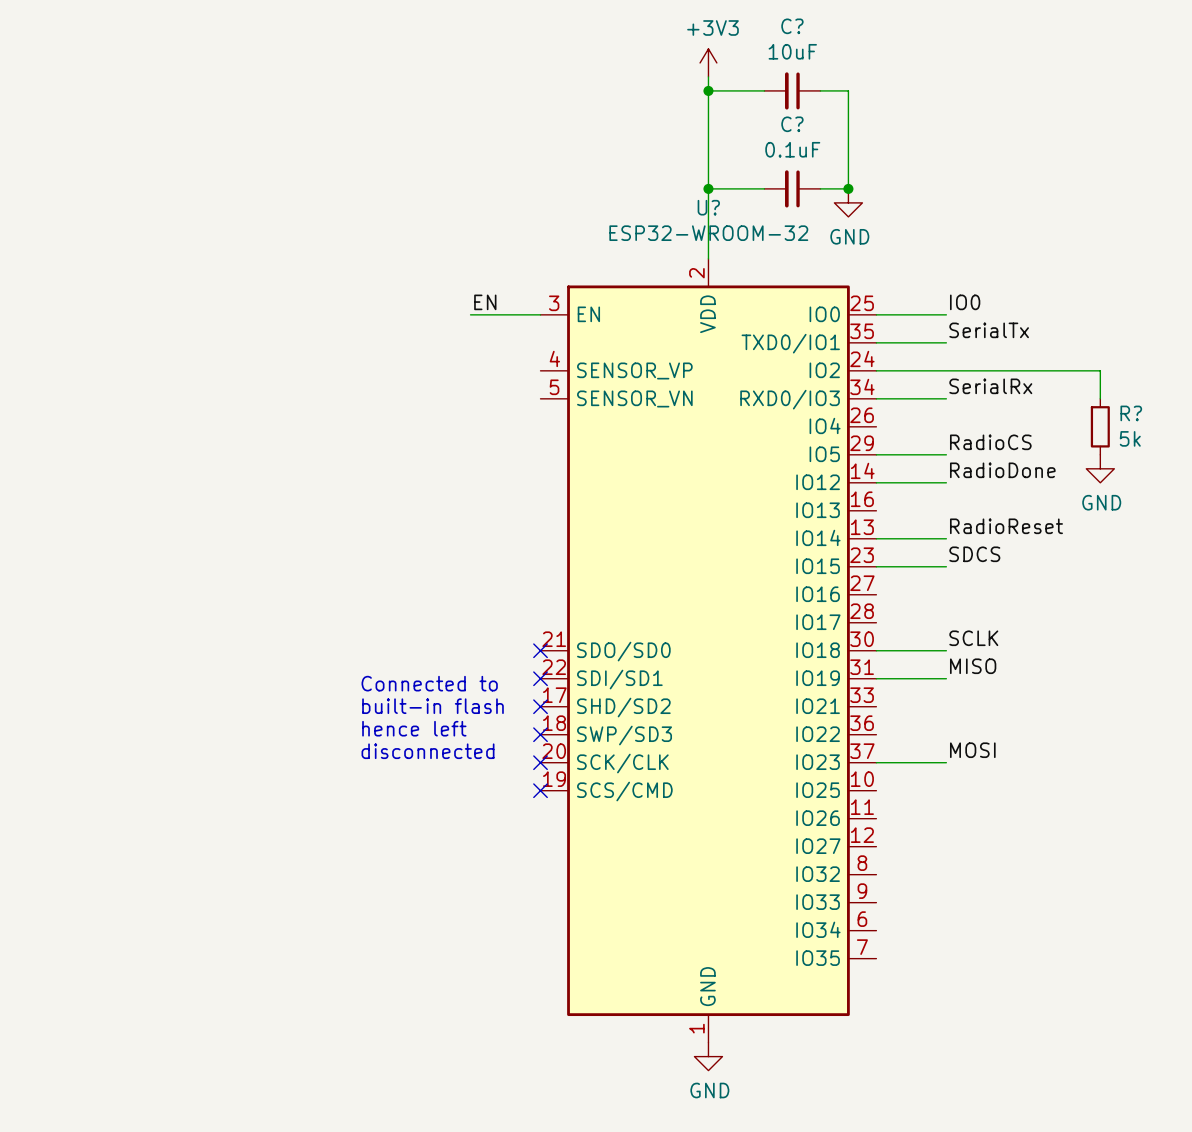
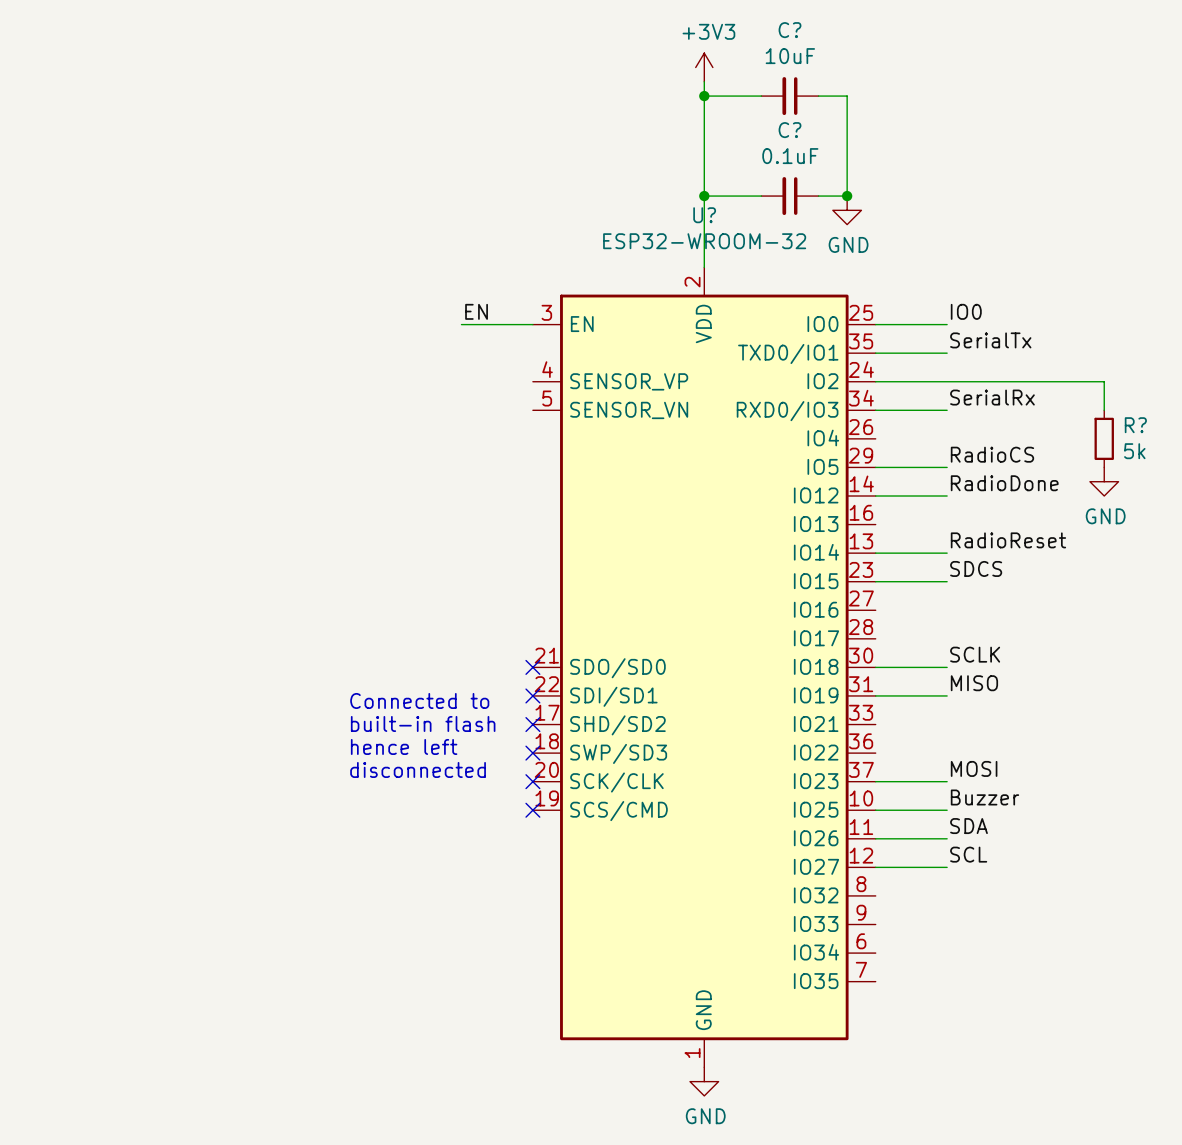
label: none -> Buzzer (984, 797)
wire: none -> (875, 810) (947, 810)
label: none -> SDA (969, 826)
wire: none -> (875, 838) (947, 838)
label: none -> SCL (968, 854)
wire: none -> (875, 867) (947, 867)

